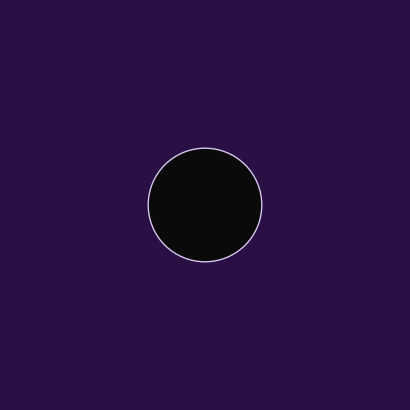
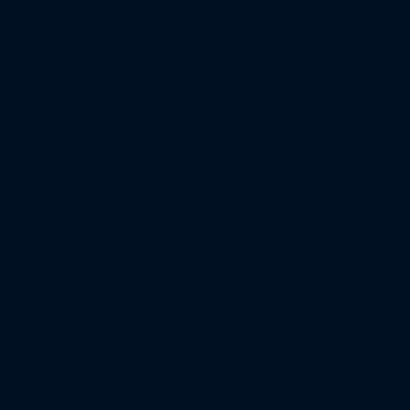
part: (204, 204) -> none

